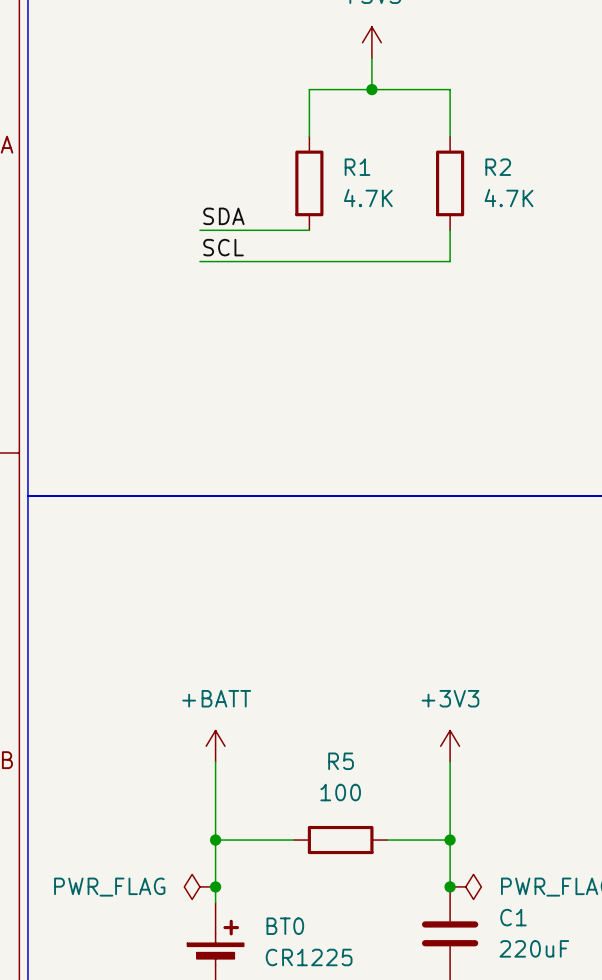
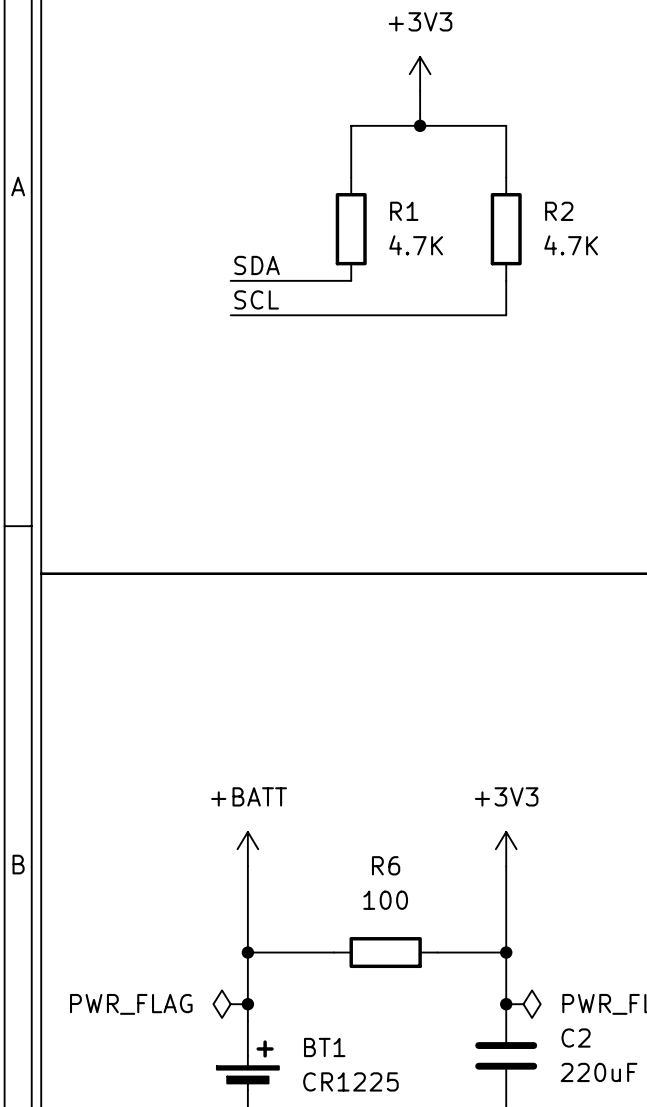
R5 name: R5 (341, 761) -> R6 (386, 865)
C1 name: C1 (513, 917) -> C2 (576, 1038)
BT0 name: BT0 (285, 926) -> BT1 (324, 1047)

